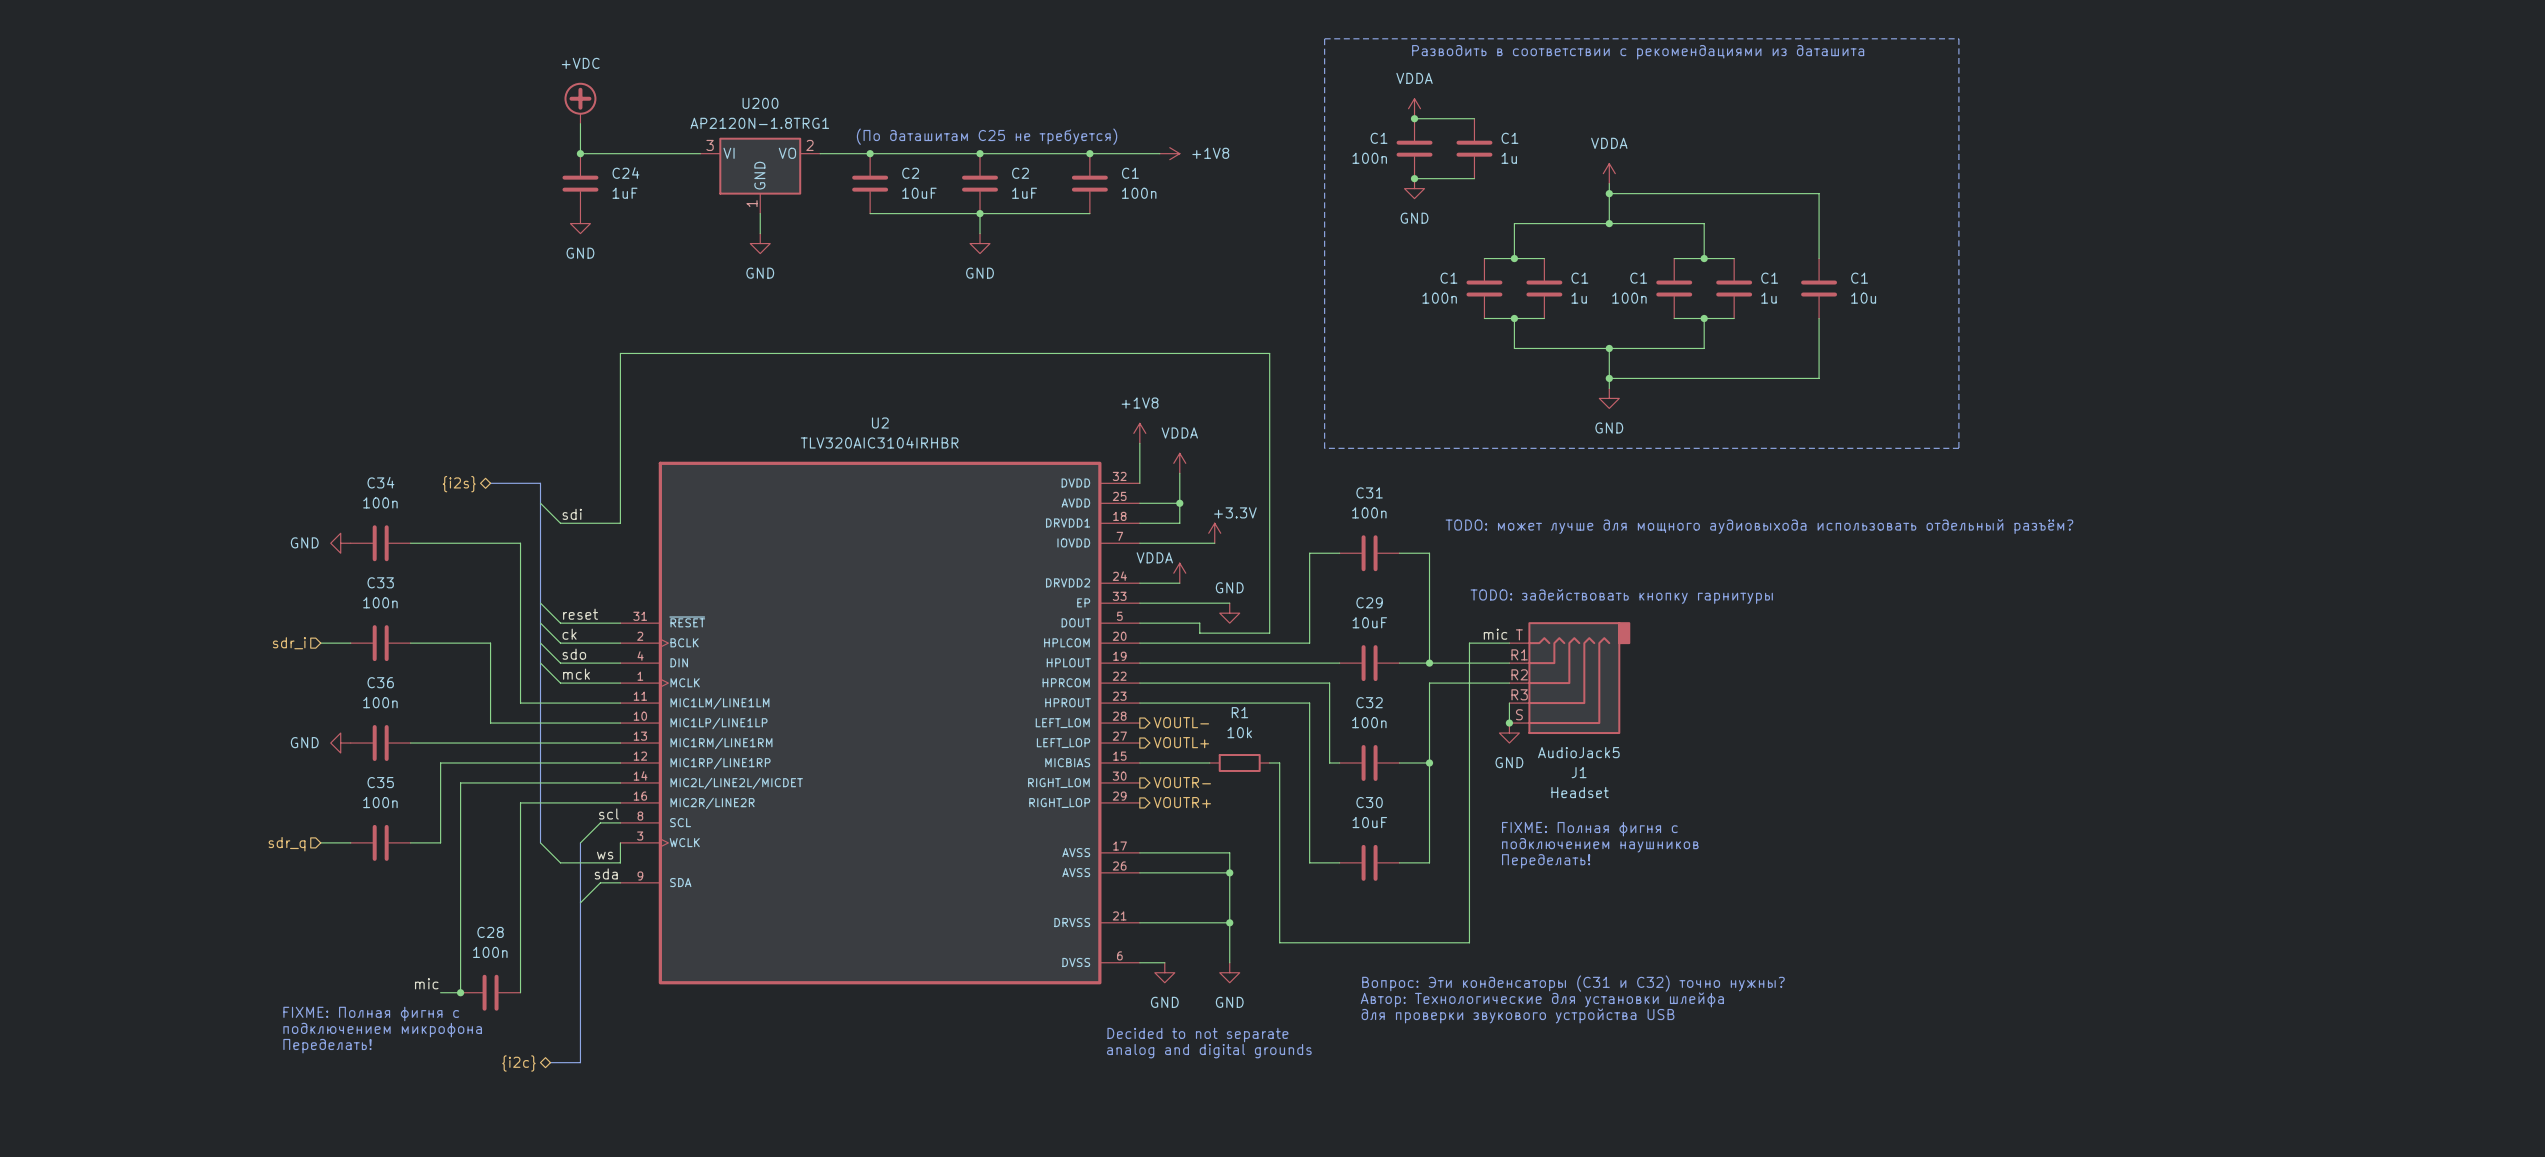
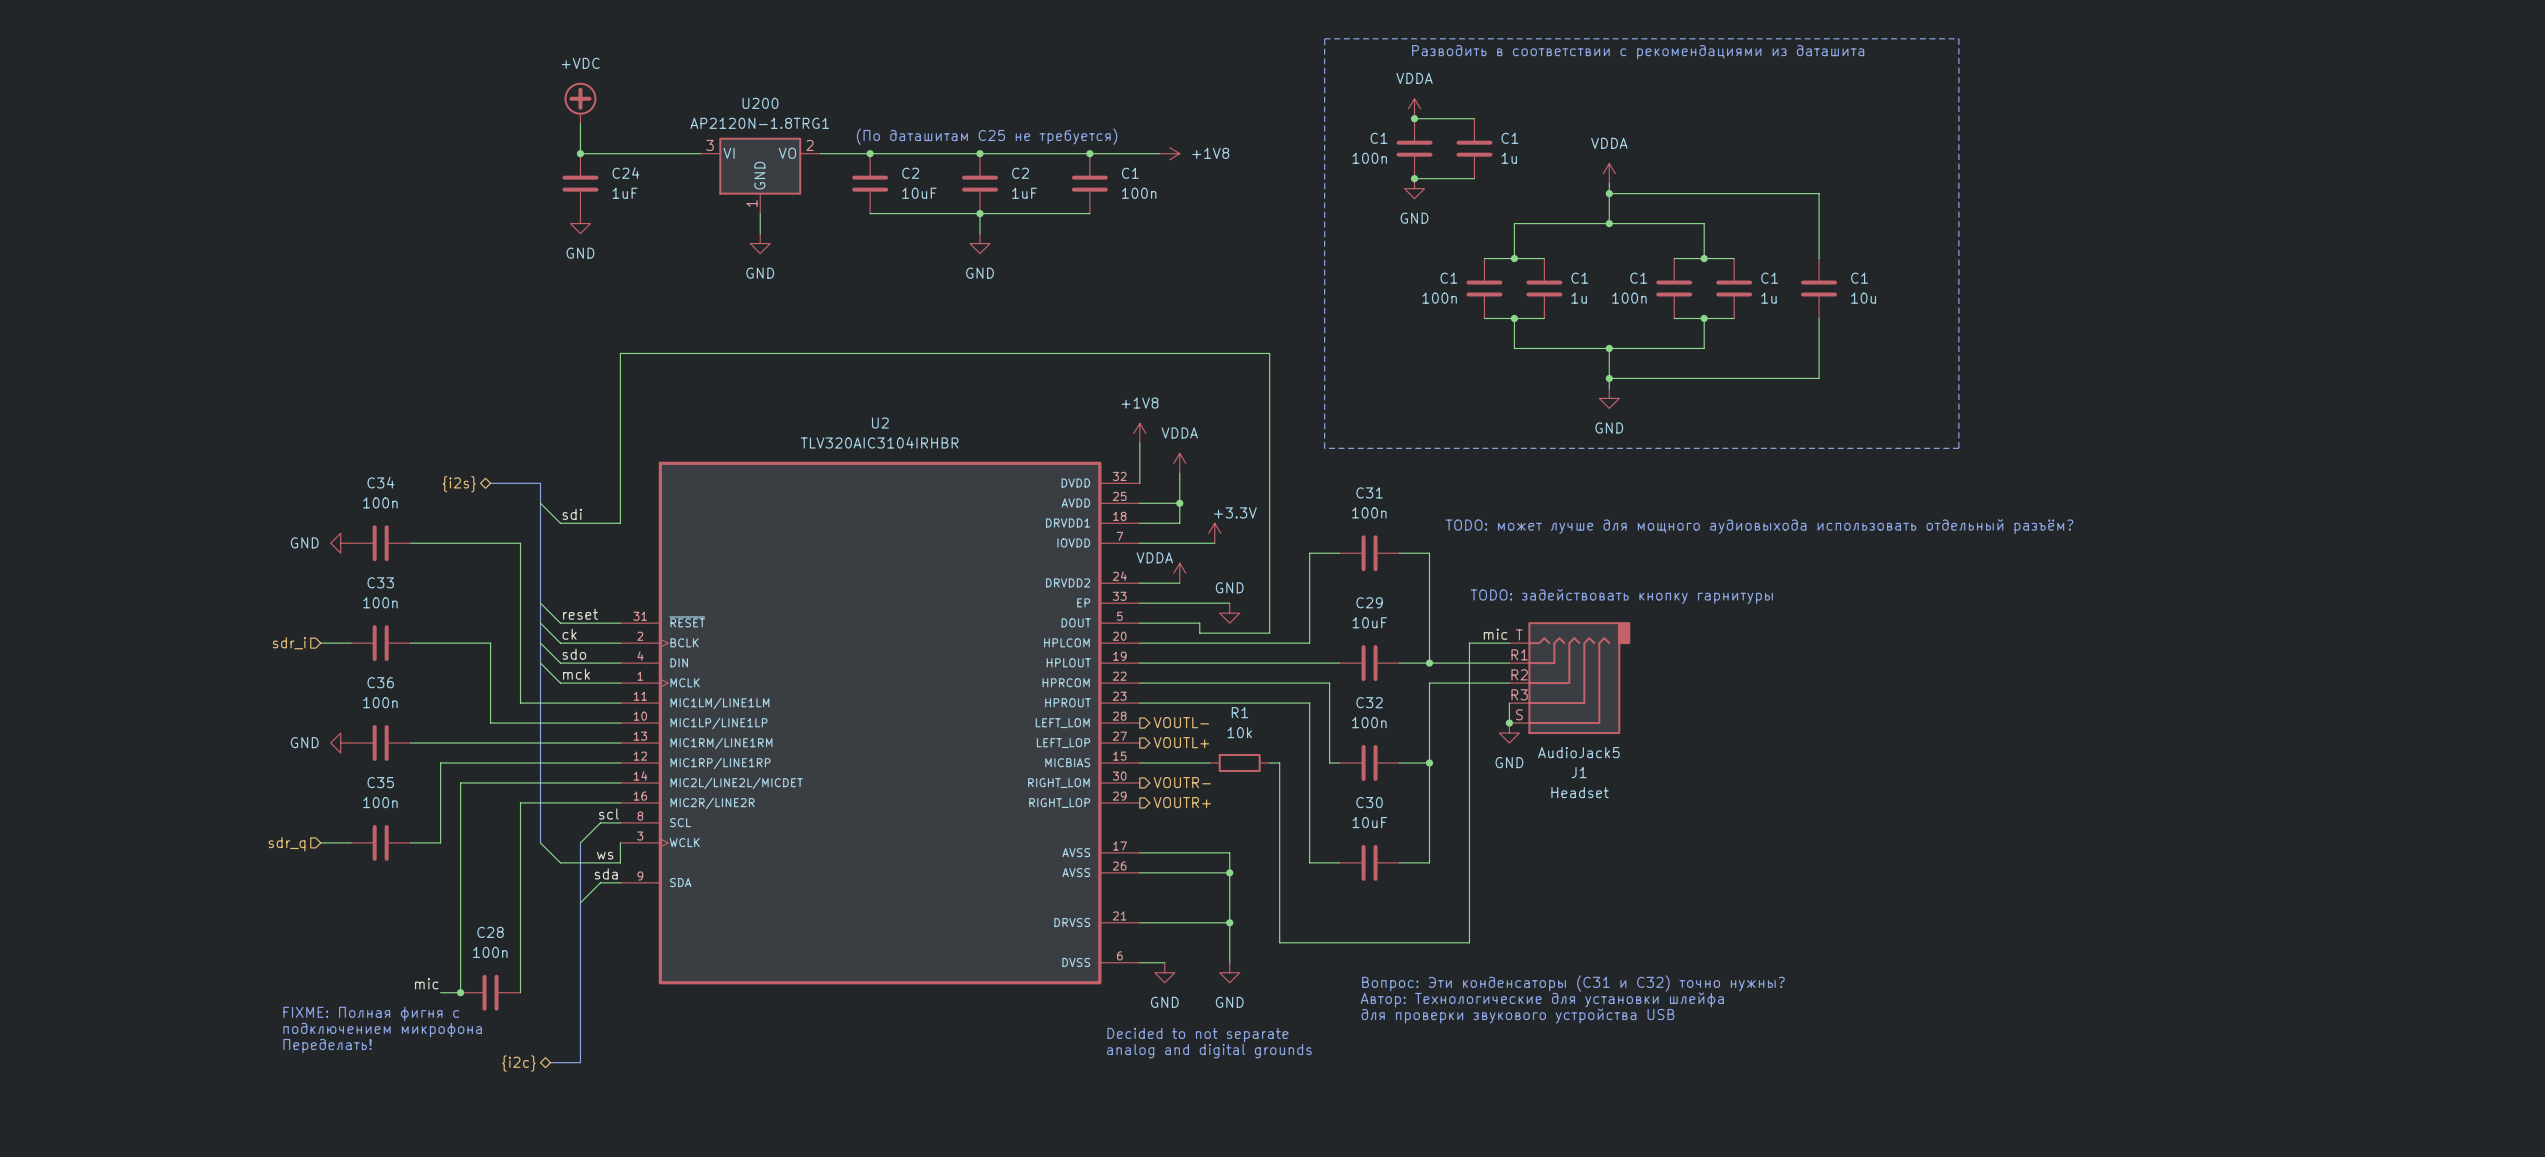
text: FIXME: Полная фигня с (1589, 829) -> none
text: подключением наушников (1600, 845) -> none
text: Переделать! (1546, 861) -> none

